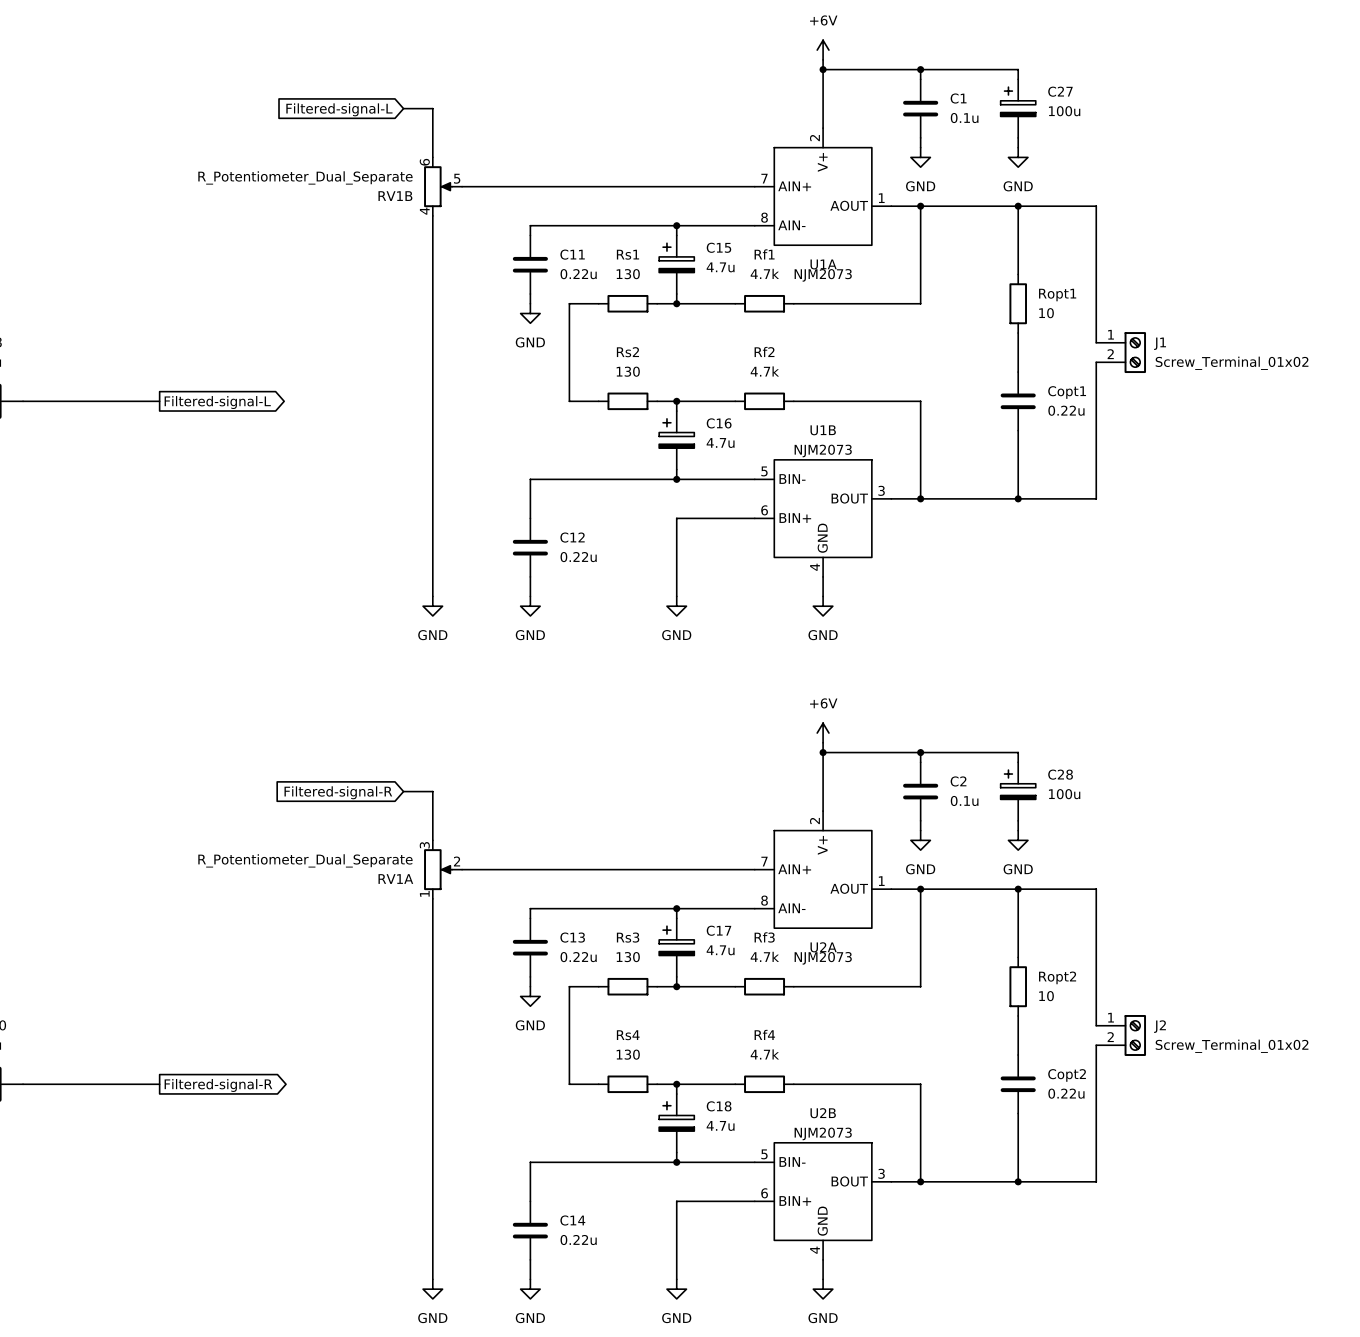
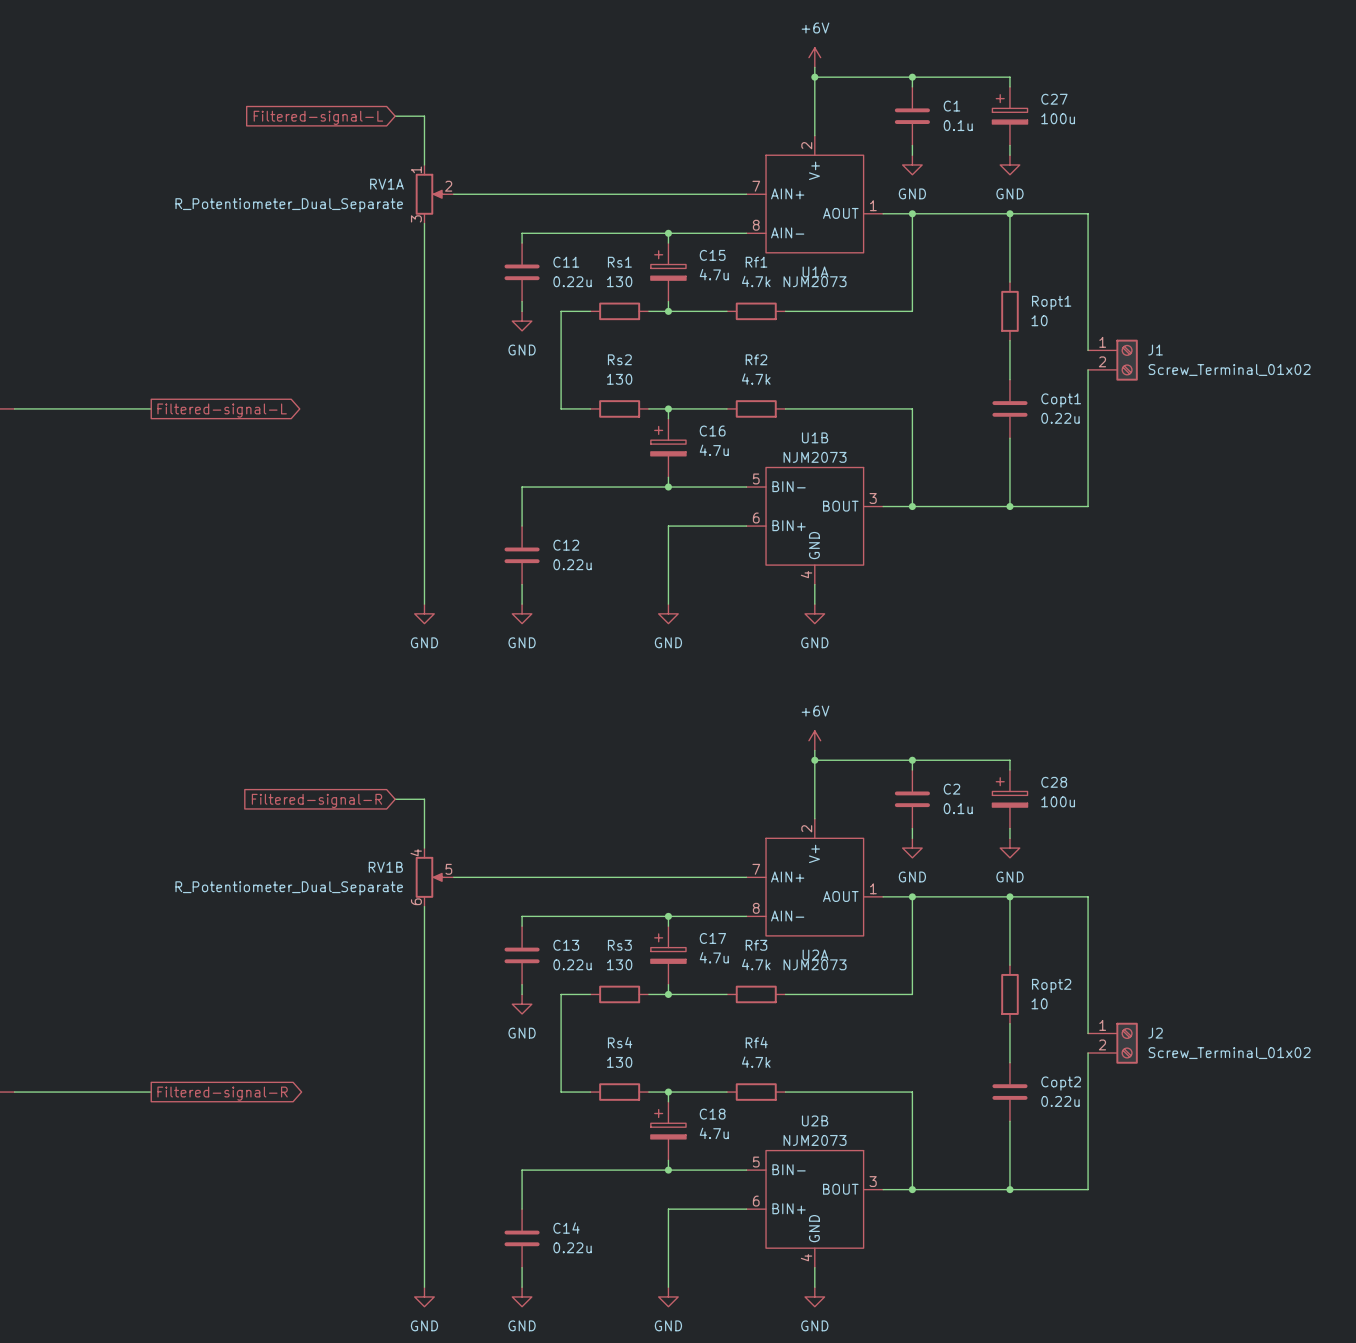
RV1B flip: as is (438, 186) -> up-down (429, 877)
RV1B position: (443, 186) -> (434, 877)
RV1A flip: as is (438, 869) -> up-down (429, 194)
RV1A position: (443, 869) -> (434, 194)

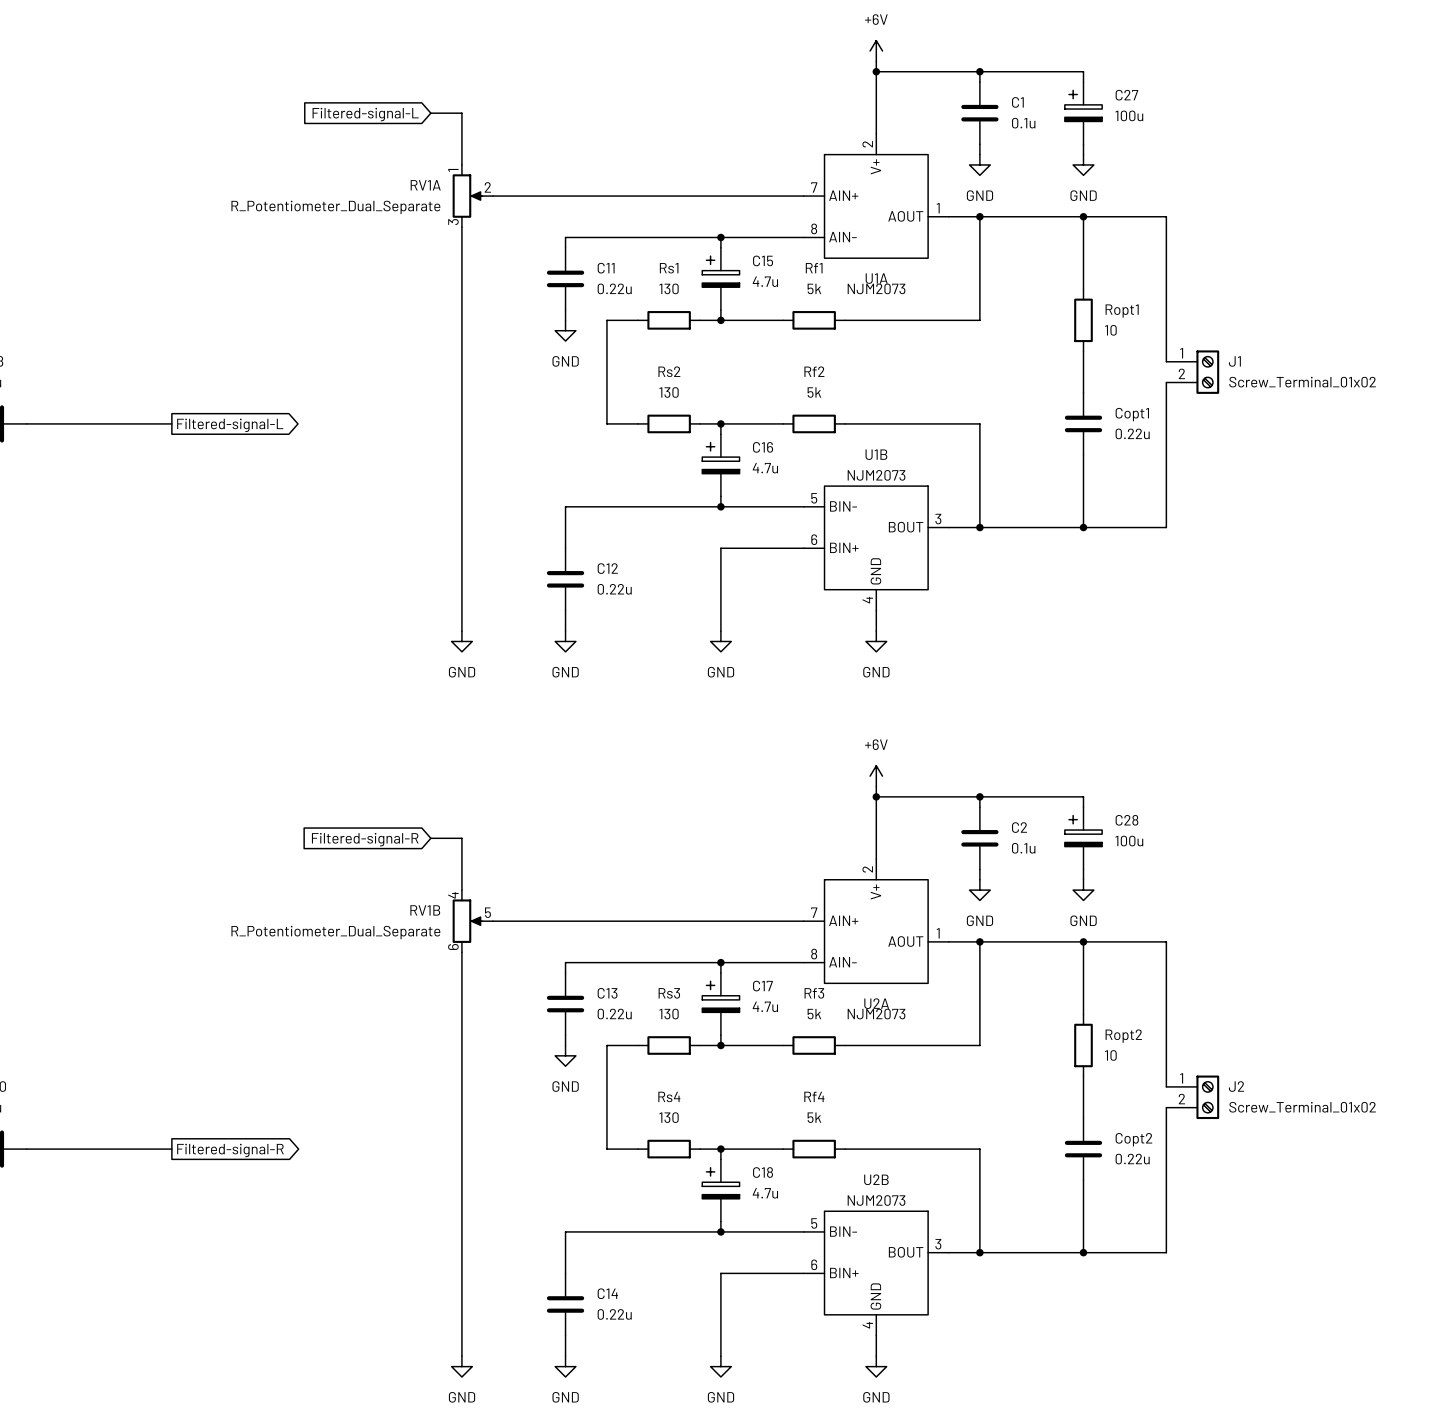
Rf1 value: 4.7k (756, 281) -> 5k (814, 288)
Rf2 value: 4.7k (756, 379) -> 5k (814, 392)
Rf3 value: 4.7k (756, 964) -> 5k (814, 1014)
Rf4 value: 4.7k (756, 1062) -> 5k (814, 1117)

